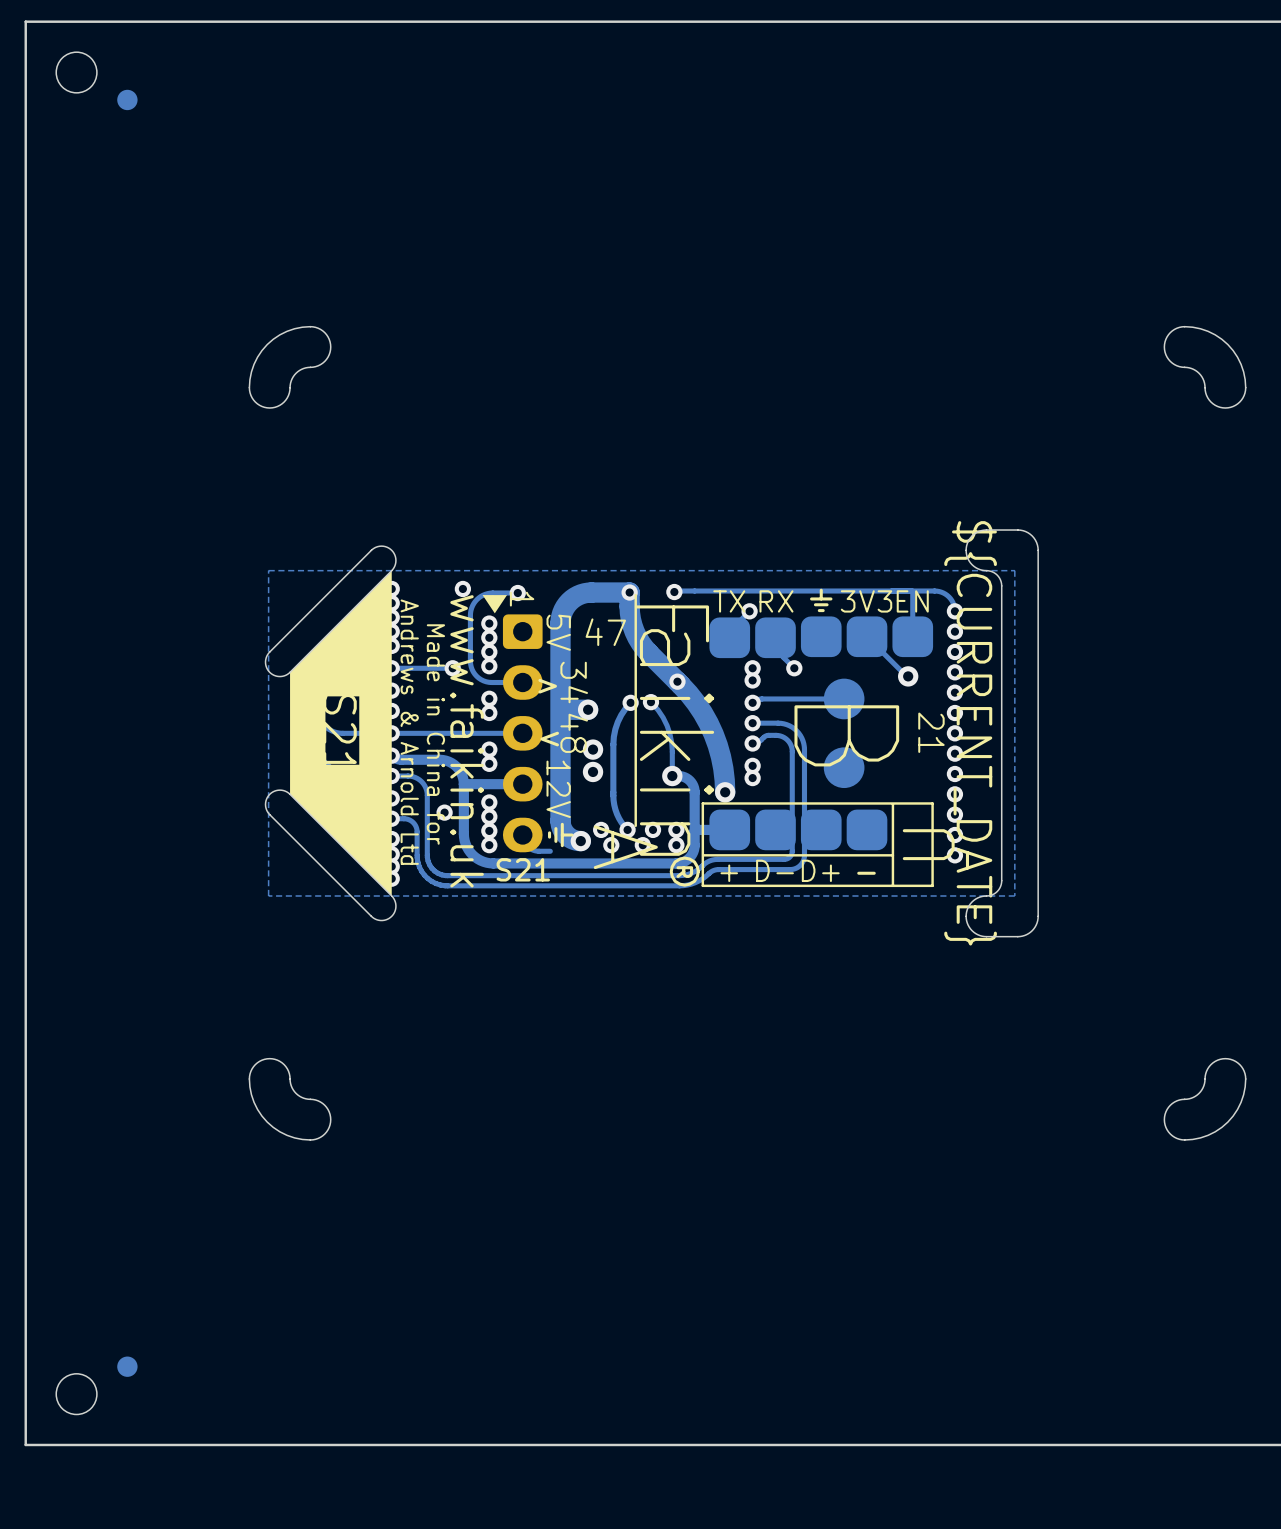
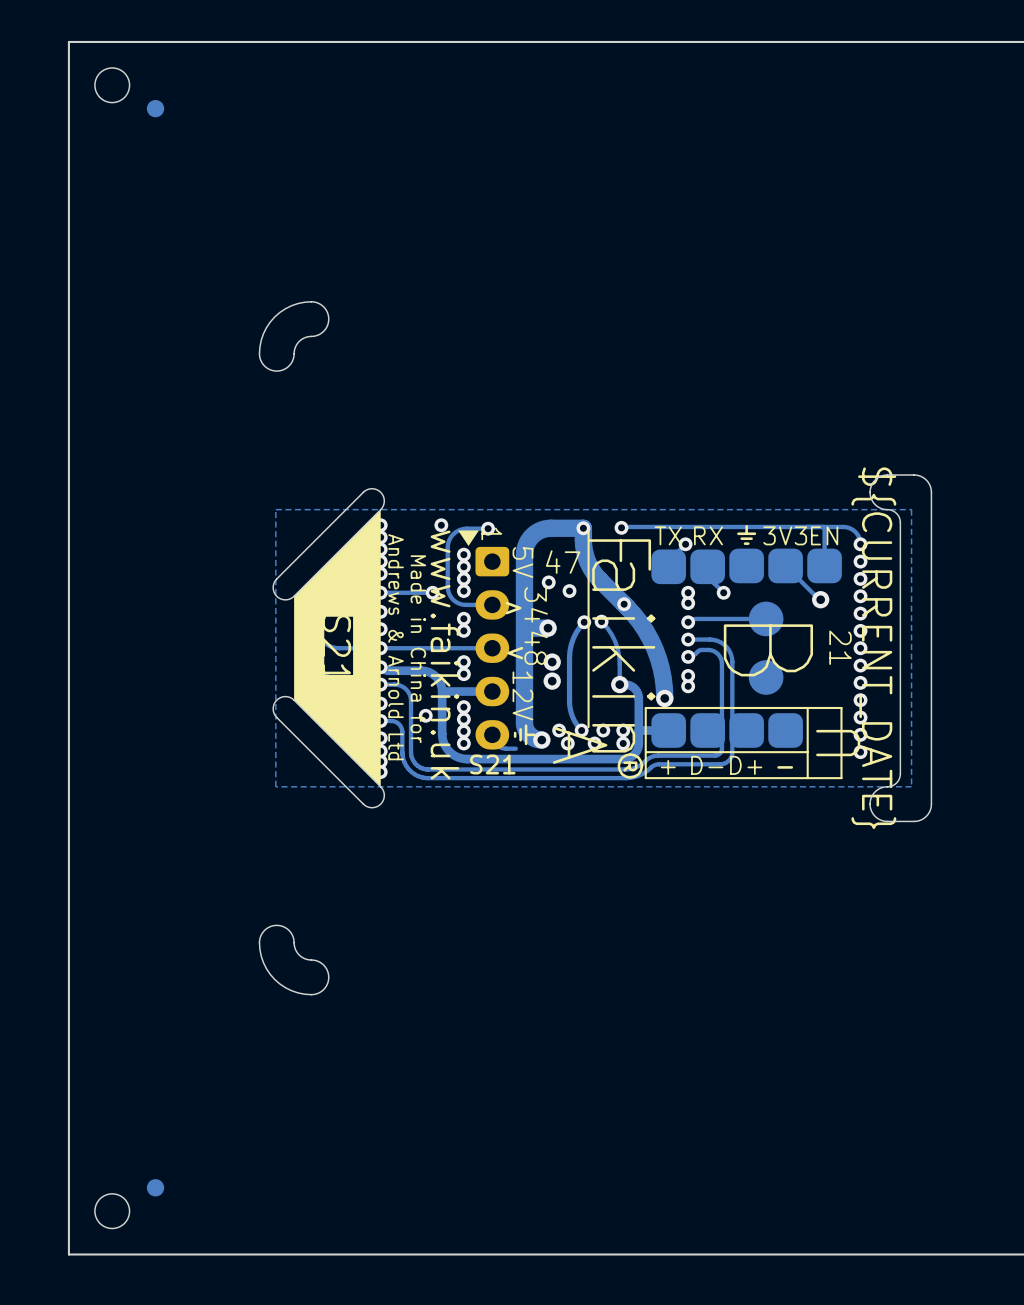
via: none -> (548, 582)
via: none -> (569, 591)

